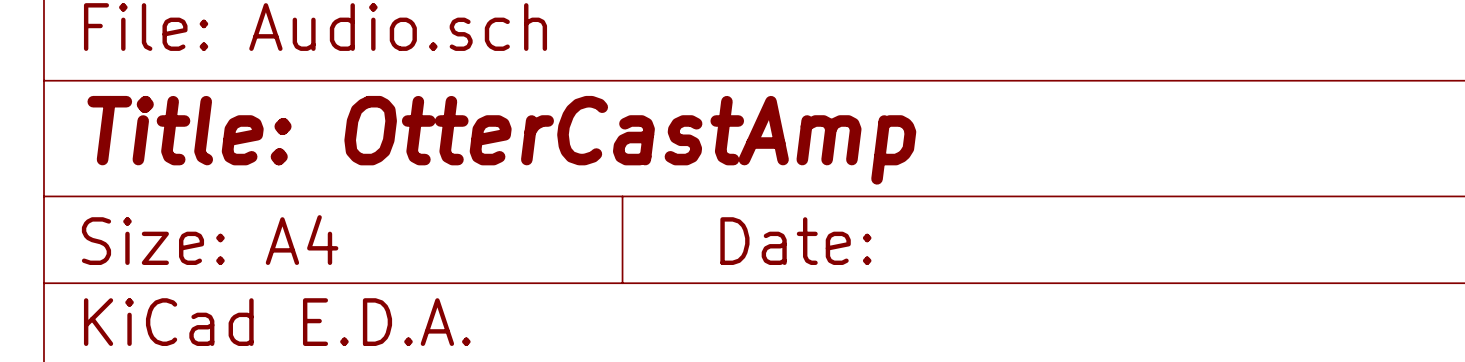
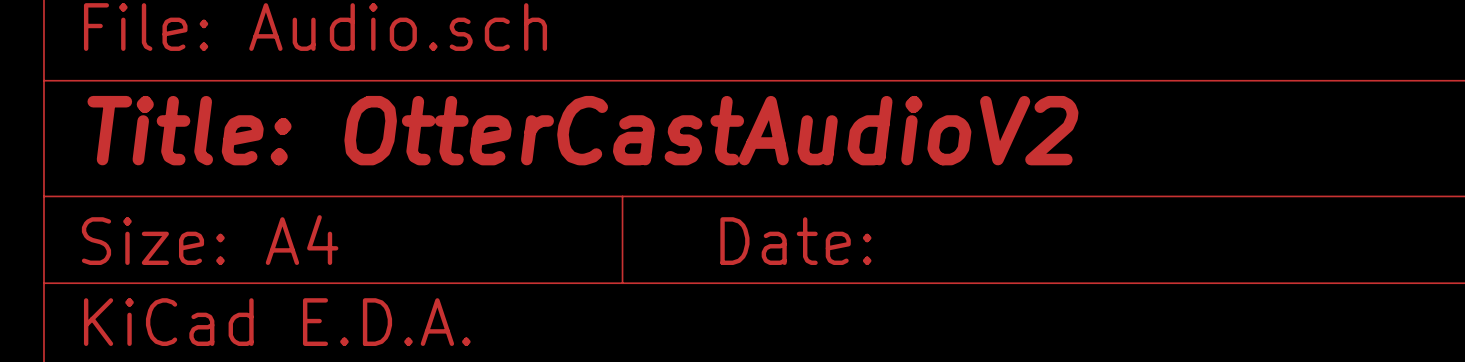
title block: Title: OtterCastAmp (501, 140) -> Title: OtterCastAudioV2 (582, 130)

